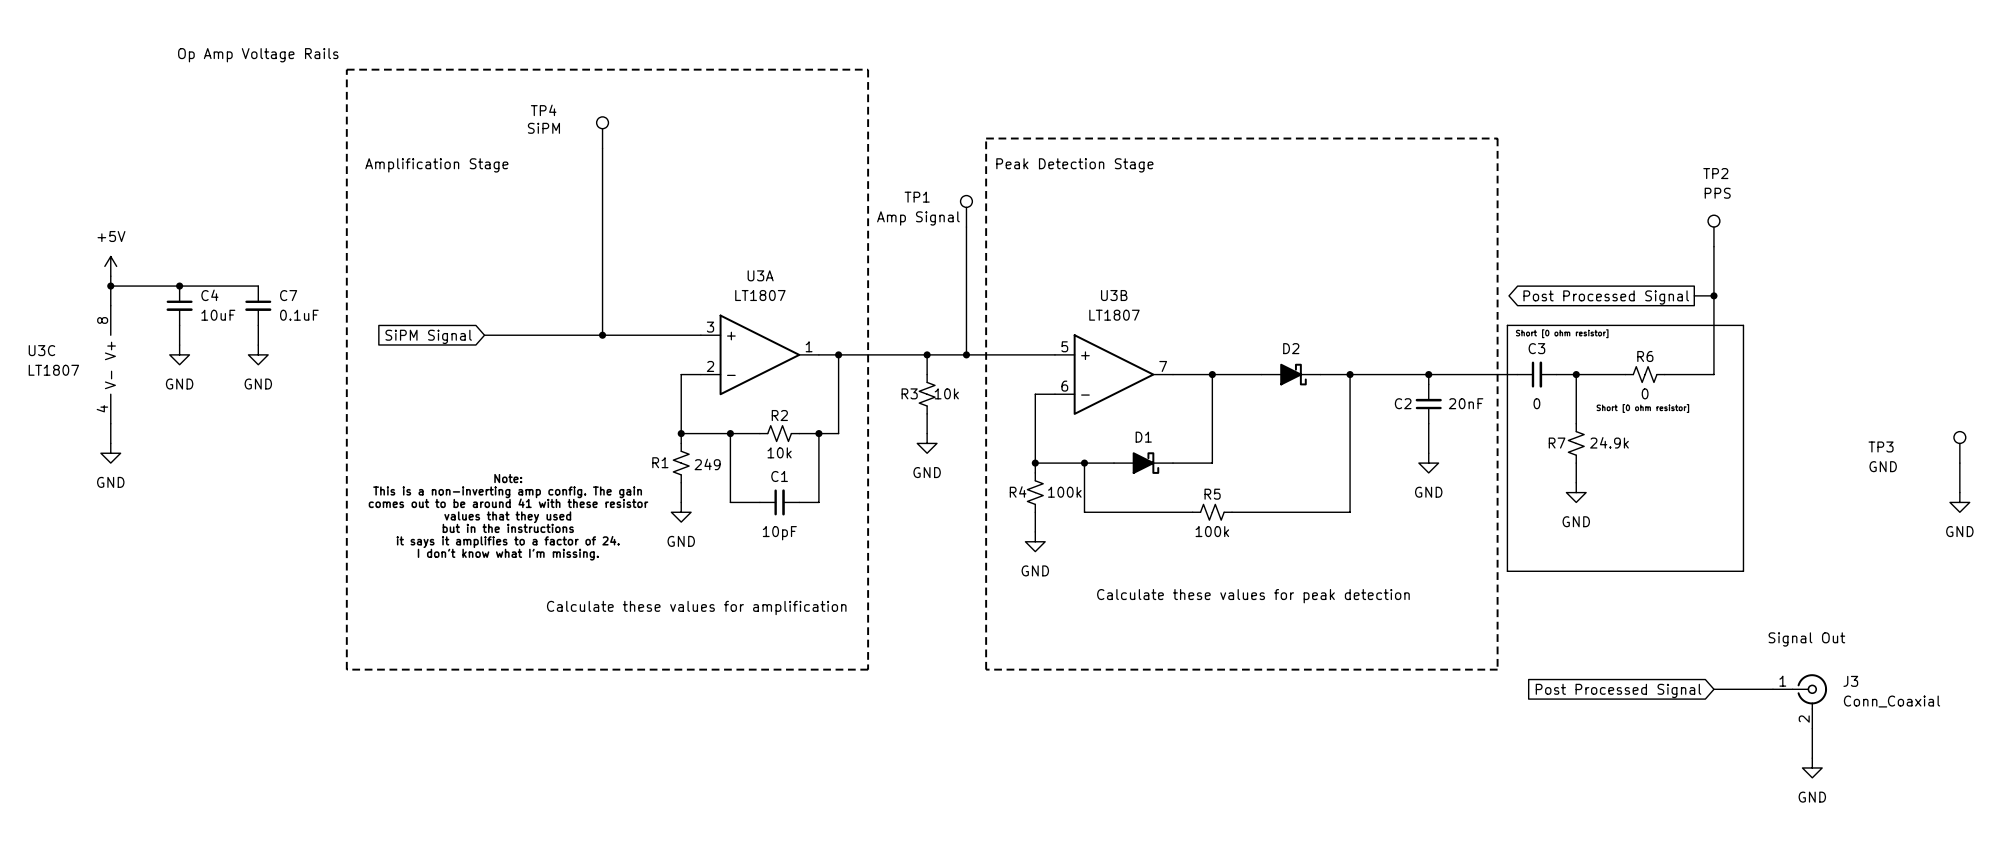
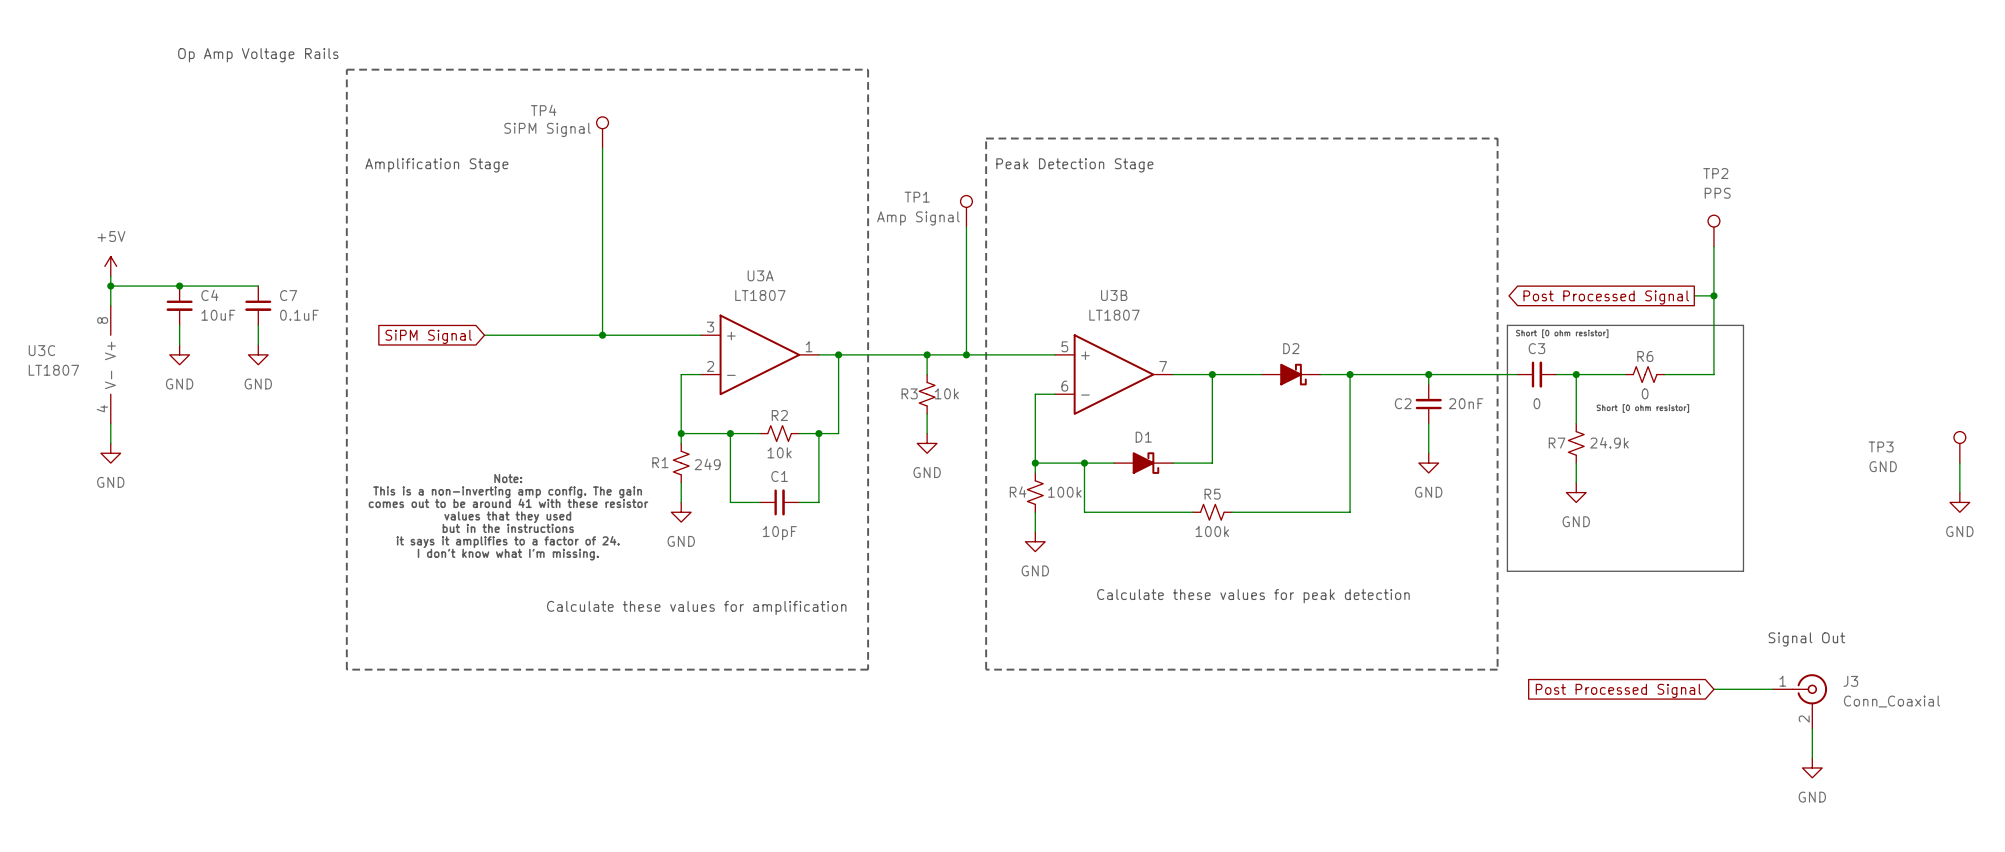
TP4 value: SiPM (543, 128) -> SiPM Signal (547, 129)

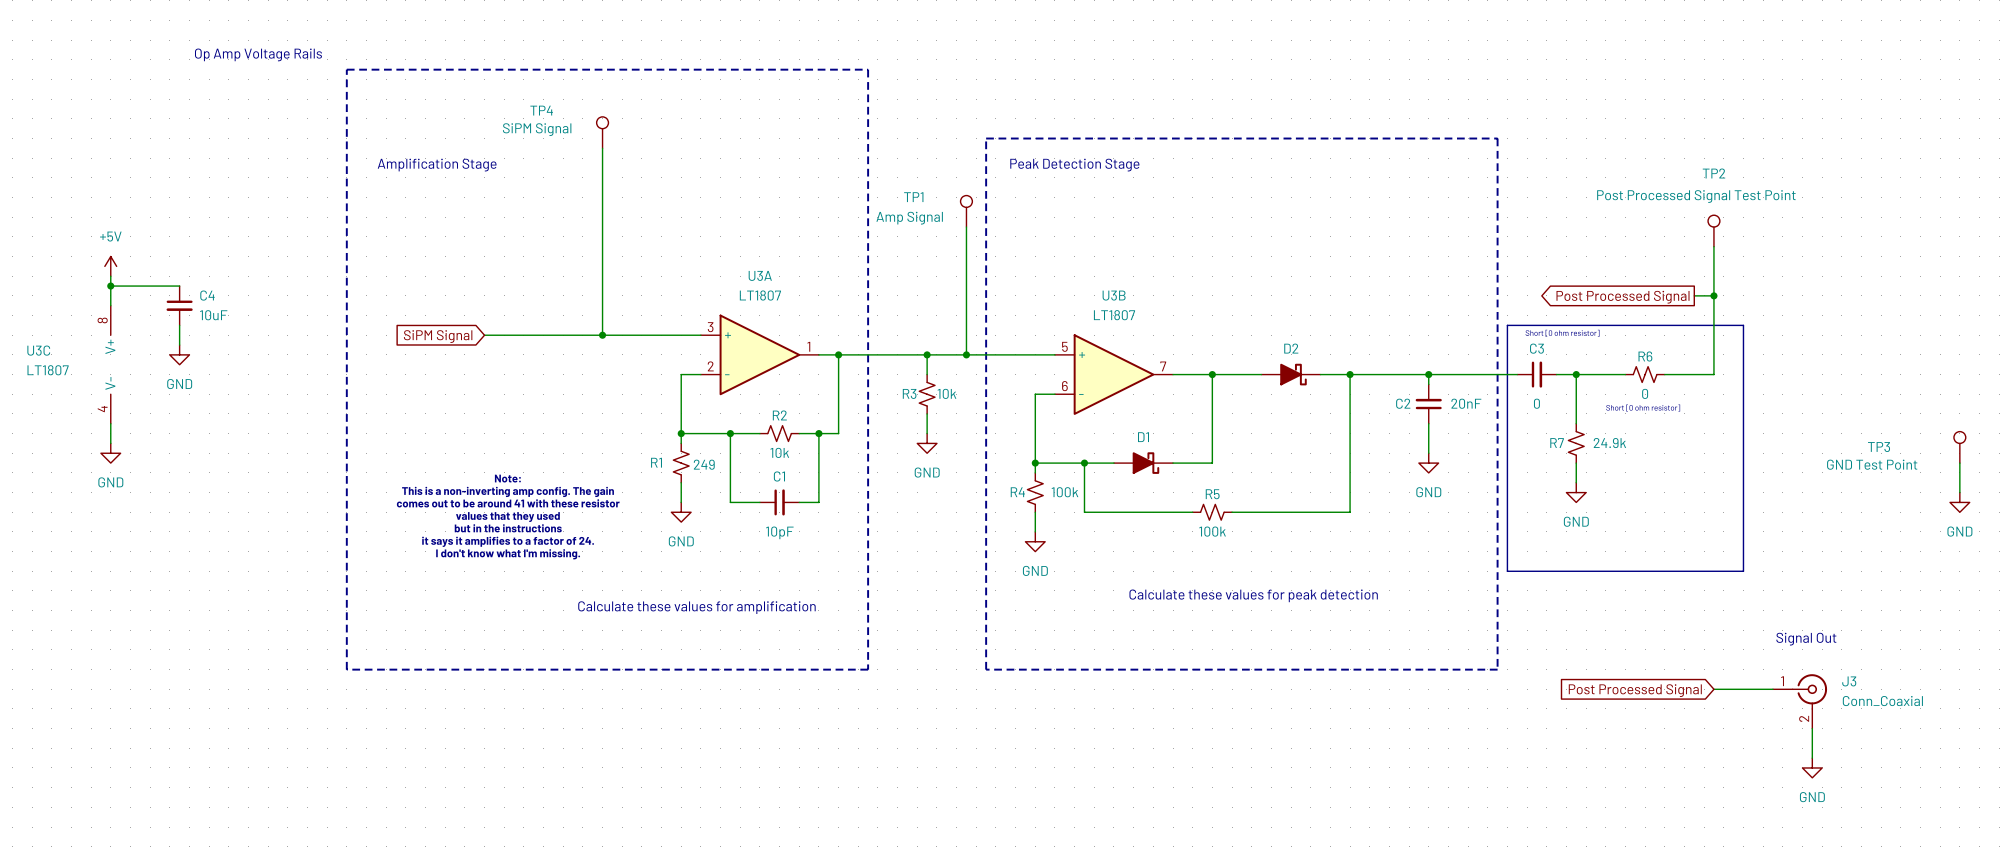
TP2 value: PPS (1717, 193) -> Post Processed Signal Test Point (1696, 196)
wire: (179, 286) (258, 286) -> none
junction: (179, 286) -> none
C7: 0.1uF (258, 305) -> none
wire: (258, 325) (258, 345) -> none
power symbol: GND (258, 354) -> none
TP3 value: GND (1883, 466) -> GND Test Point (1872, 464)

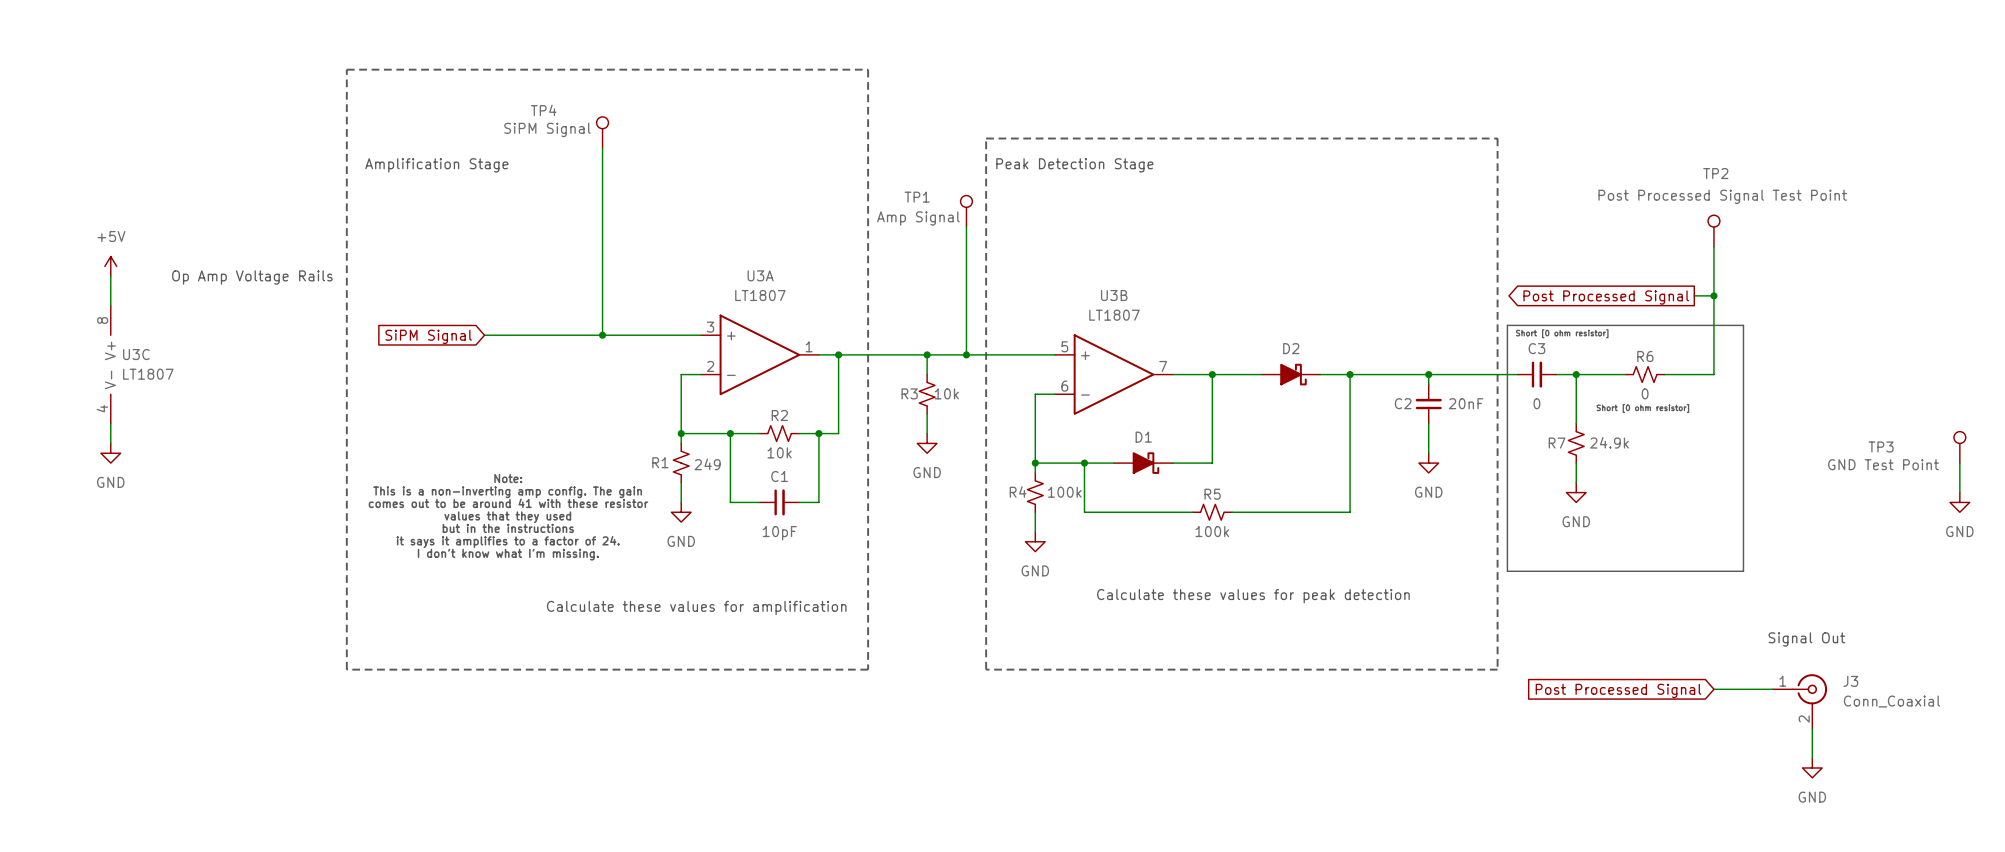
text: Op Amp Voltage Rails (258, 54) -> none
text: none -> Op Amp Voltage Rails (252, 277)
wire: (110, 286) (179, 286) -> none
junction: (110, 286) -> none
C4: 10uF (179, 305) -> none
wire: (179, 325) (179, 345) -> none
U3C name position: U3C (38, 350) -> U3C (136, 354)
power symbol: GND (179, 354) -> none
U3C value position: LT1807 (48, 370) -> LT1807 (148, 374)

